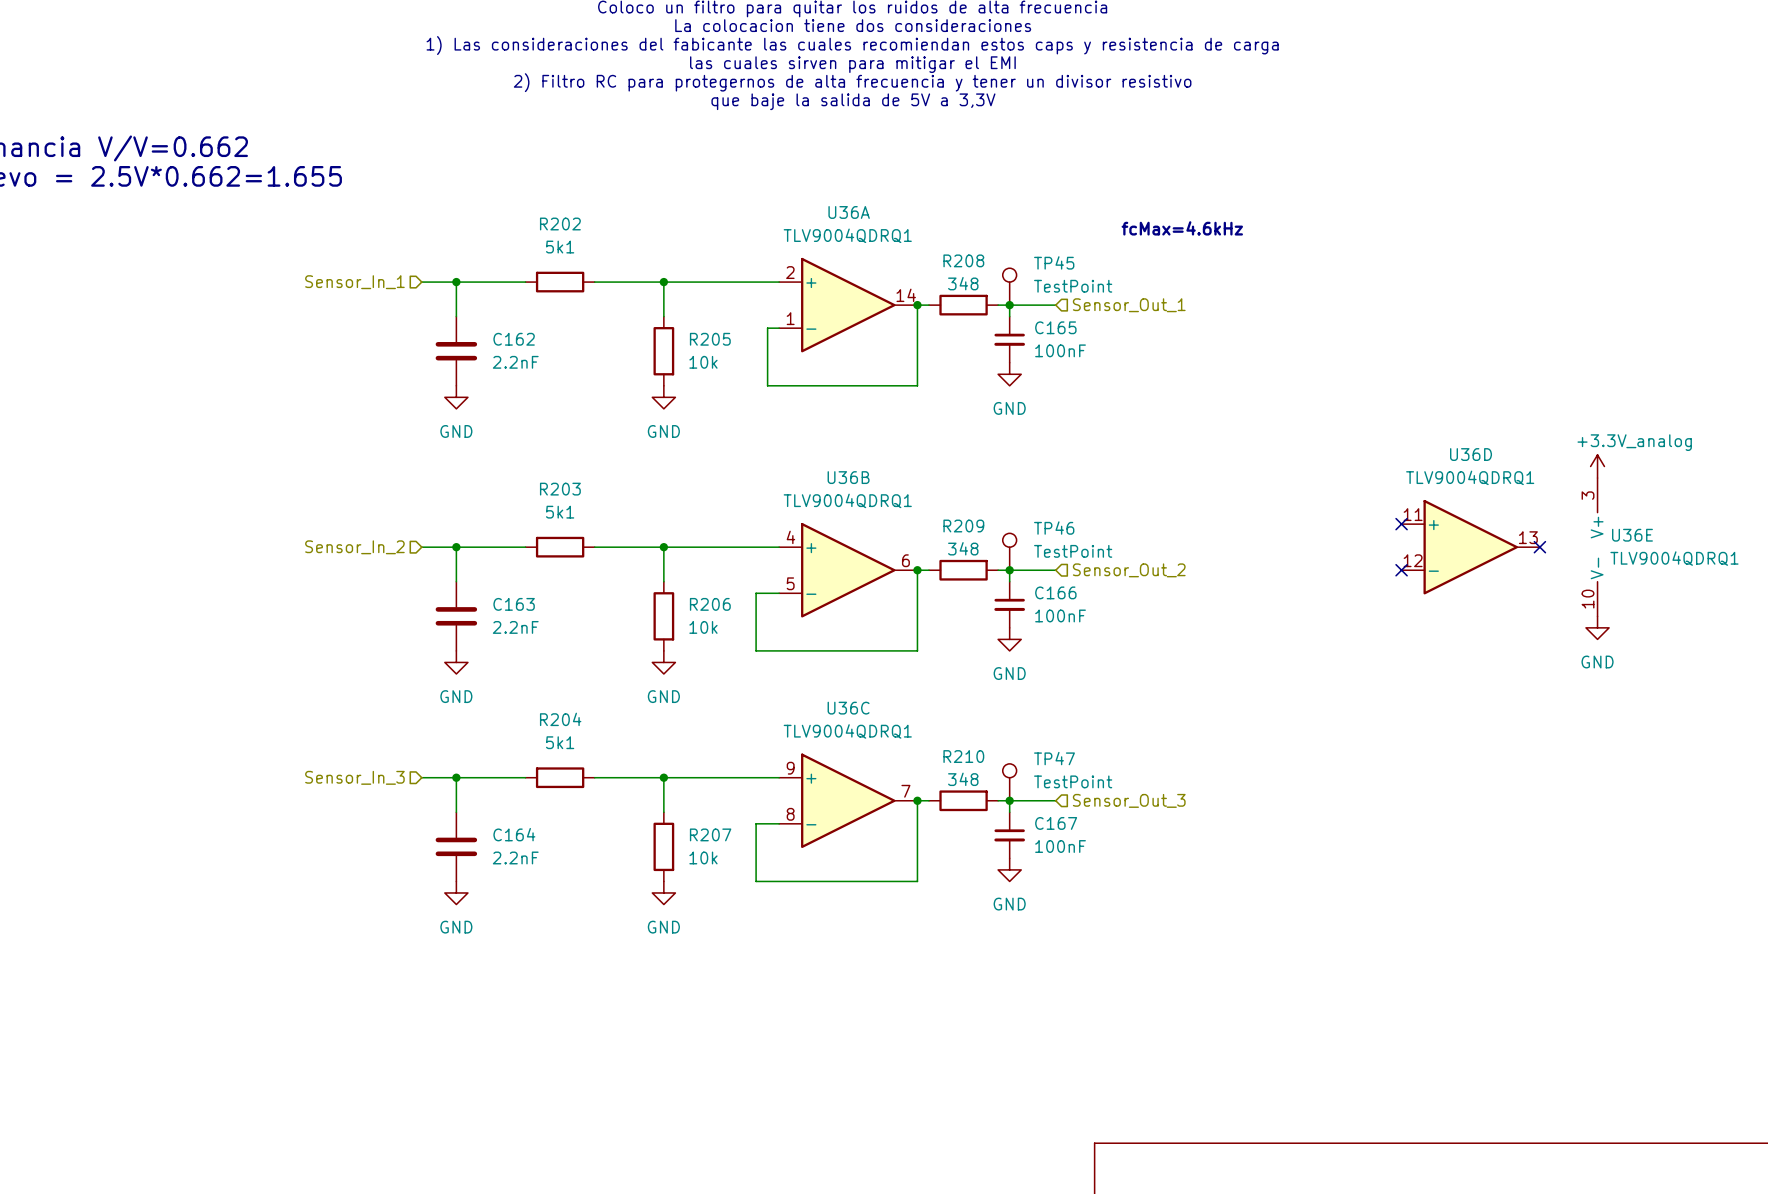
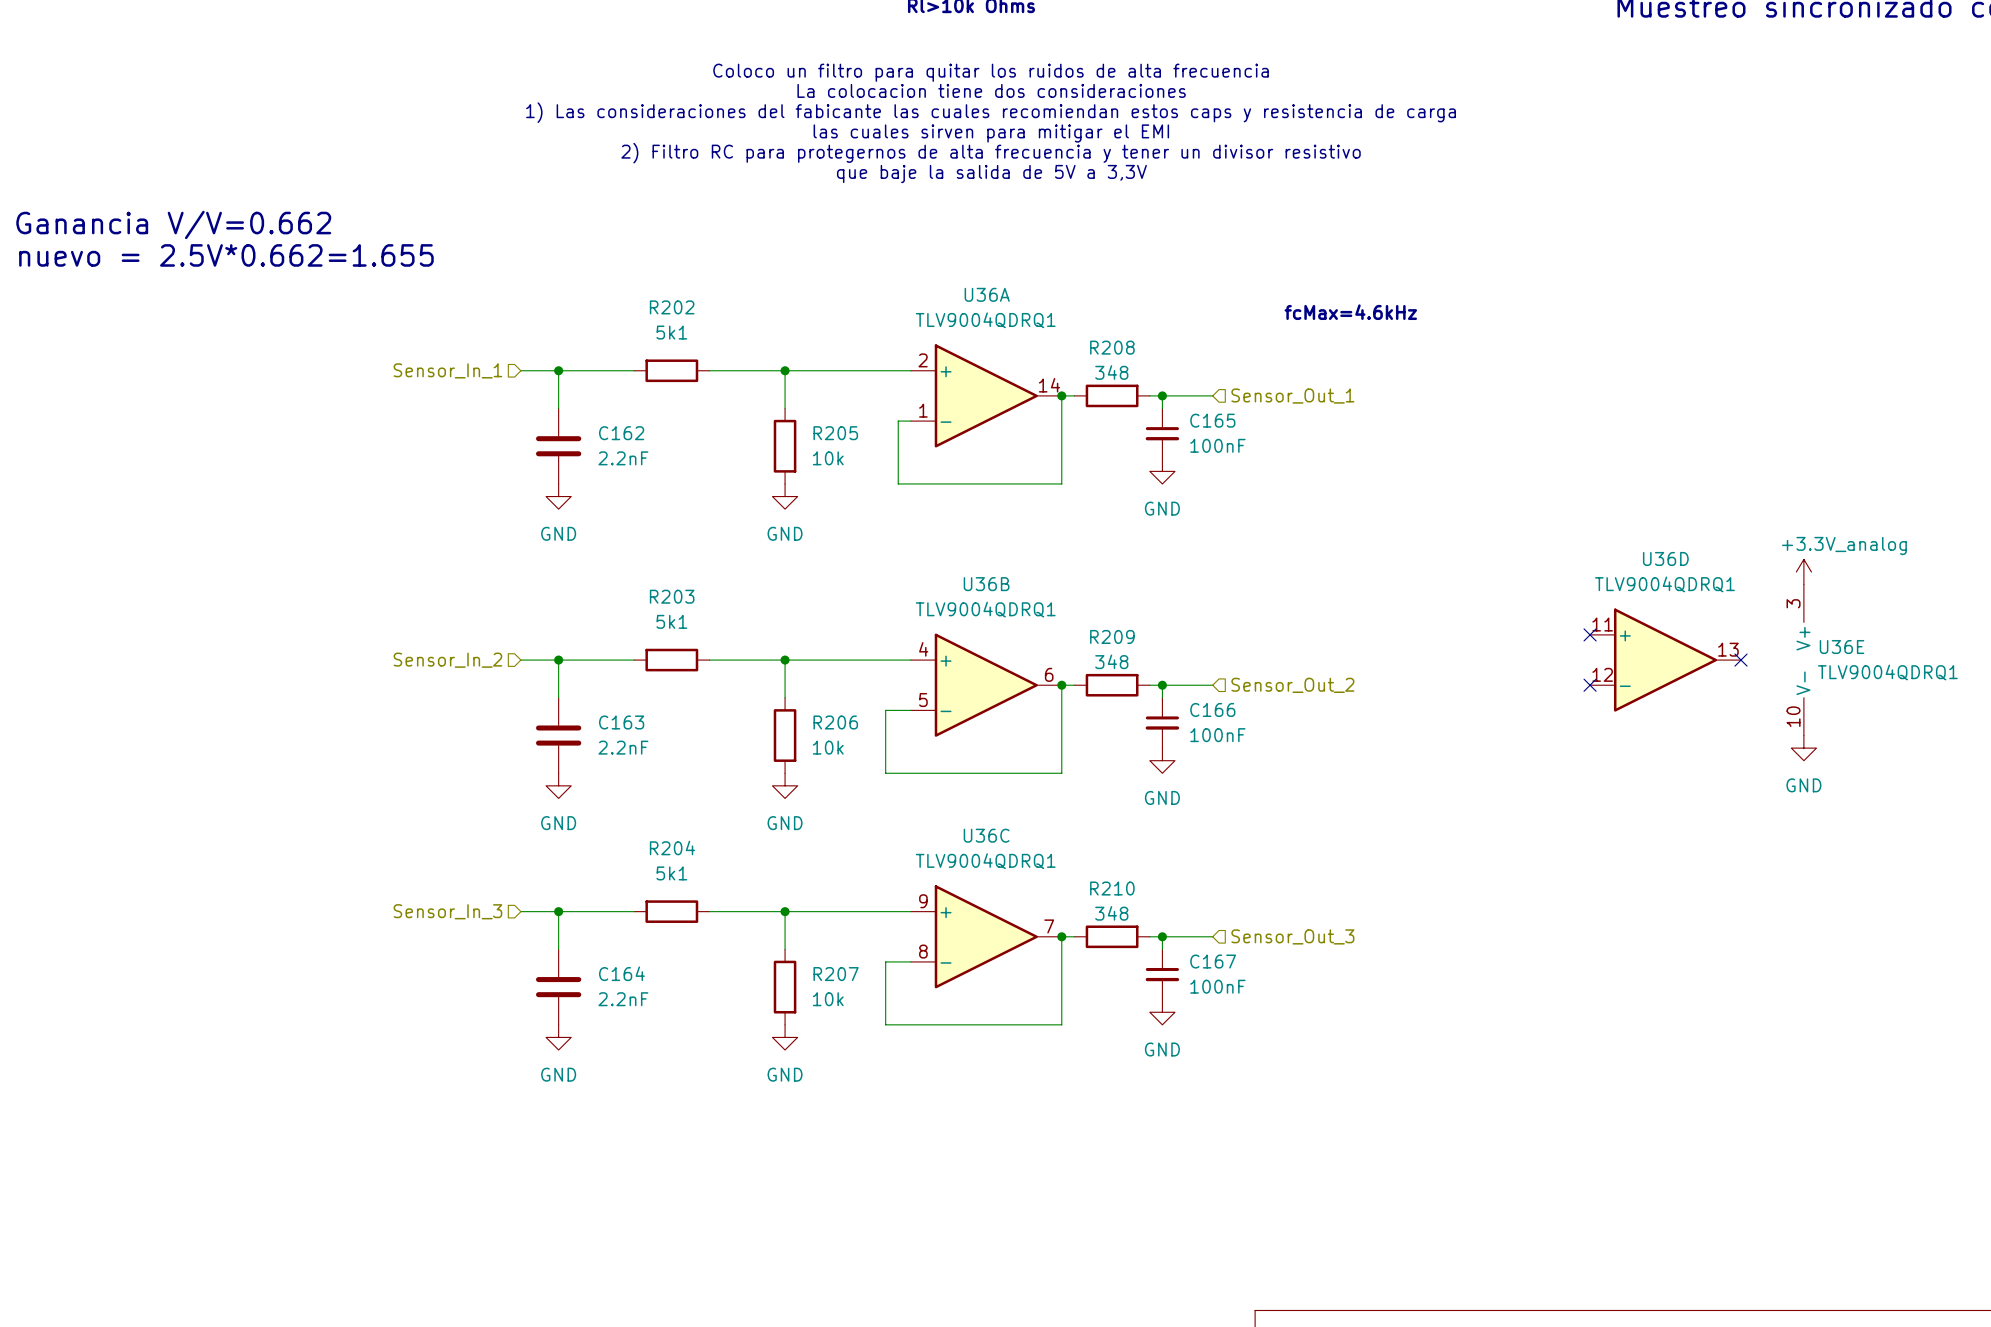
TP45: TestPoint (1009, 286) -> none
TP46: TestPoint (1009, 551) -> none
TP47: TestPoint (1009, 782) -> none

